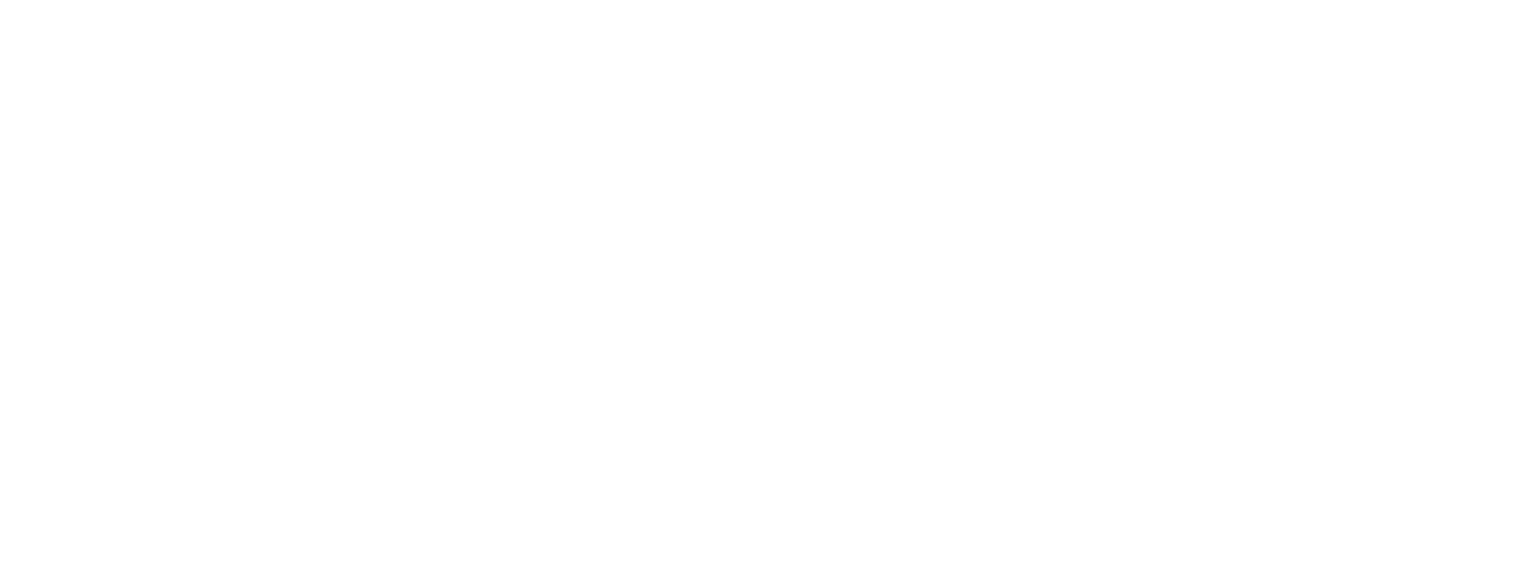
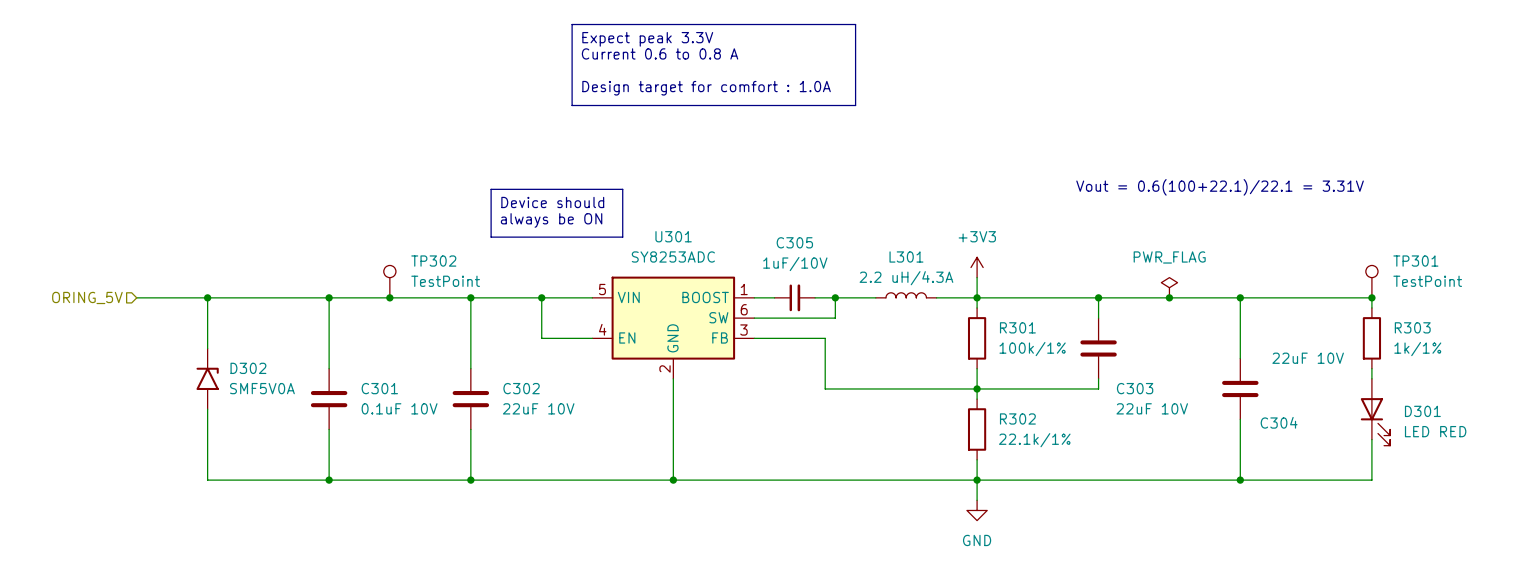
line: none -> (572, 24) (855, 24) (855, 105) (572, 105) (572, 24)
text: none -> Expect peak 3.3V (647, 39)
text: none -> Current 0.6 to 0.8 A (660, 53)
text: none -> Design target for comfort : 1.0A (706, 88)
text: none -> Vout = 0.6(100+22.1)/22.1 = 3.31V (1220, 187)
line: none -> (491, 189) (622, 189) (622, 237) (491, 237) (491, 189)
text: none -> Device should (552, 202)
text: none -> always be ON (551, 220)
power symbol: none -> +3V3 (977, 267)
wire: none -> (977, 277) (977, 307)
TP302: none -> TestPoint (389, 281)
TP301: none -> TestPoint (1371, 281)
power symbol: none -> PWR_FLAG (1169, 287)
L301: none -> 2.2 uH/4.3A (906, 295)
hierarchical label: none -> ORING_5V (87, 297)
wire: none -> (136, 297) (592, 297)
wire: none -> (207, 297) (207, 348)
junction: none -> (207, 297)
wire: none -> (329, 297) (329, 368)
junction: none -> (329, 297)
junction: none -> (389, 297)
wire: none -> (470, 297) (470, 368)
junction: none -> (470, 297)
wire: none -> (541, 297) (541, 338) (592, 338)
junction: none -> (541, 297)
wire: none -> (754, 297) (774, 297)
C305: none -> 1uF/10V (794, 297)
wire: none -> (815, 297) (875, 297)
wire: none -> (835, 297) (835, 318) (754, 318)
junction: none -> (835, 297)
wire: none -> (936, 297) (1371, 297) (1371, 307)
junction: none -> (977, 297)
wire: none -> (1098, 297) (1098, 318)
junction: none -> (1098, 297)
junction: none -> (1169, 297)
wire: none -> (1240, 297) (1240, 358)
junction: none -> (1240, 297)
junction: none -> (1371, 297)
U301: none -> SY8253ADC (673, 327)
wire: none -> (754, 338) (825, 338) (825, 388) (1098, 388) (1098, 378)
R301: none -> 100k/1% (977, 338)
R303: none -> 1k/1% (1371, 338)
C303: none -> 22uF 10V (1098, 348)
wire: none -> (977, 368) (977, 399)
wire: none -> (1371, 368) (1371, 378)
D302: none -> SMF5V0A (207, 378)
wire: none -> (673, 378) (673, 480)
junction: none -> (977, 388)
C304: none -> 22uF 10V (1240, 388)
C301: none -> 0.1uF 10V (329, 399)
C302: none -> 22uF 10V (470, 399)
wire: none -> (207, 409) (207, 480) (1371, 480) (1371, 439)
D301: none -> LED RED (1375, 412)
wire: none -> (1240, 419) (1240, 480)
wire: none -> (329, 429) (329, 480)
wire: none -> (470, 429) (470, 480)
R302: none -> 22.1k/1% (977, 429)
wire: none -> (977, 459) (977, 500)
junction: none -> (329, 480)
junction: none -> (470, 480)
junction: none -> (673, 480)
junction: none -> (977, 480)
junction: none -> (1240, 480)
power symbol: none -> GND (977, 510)

